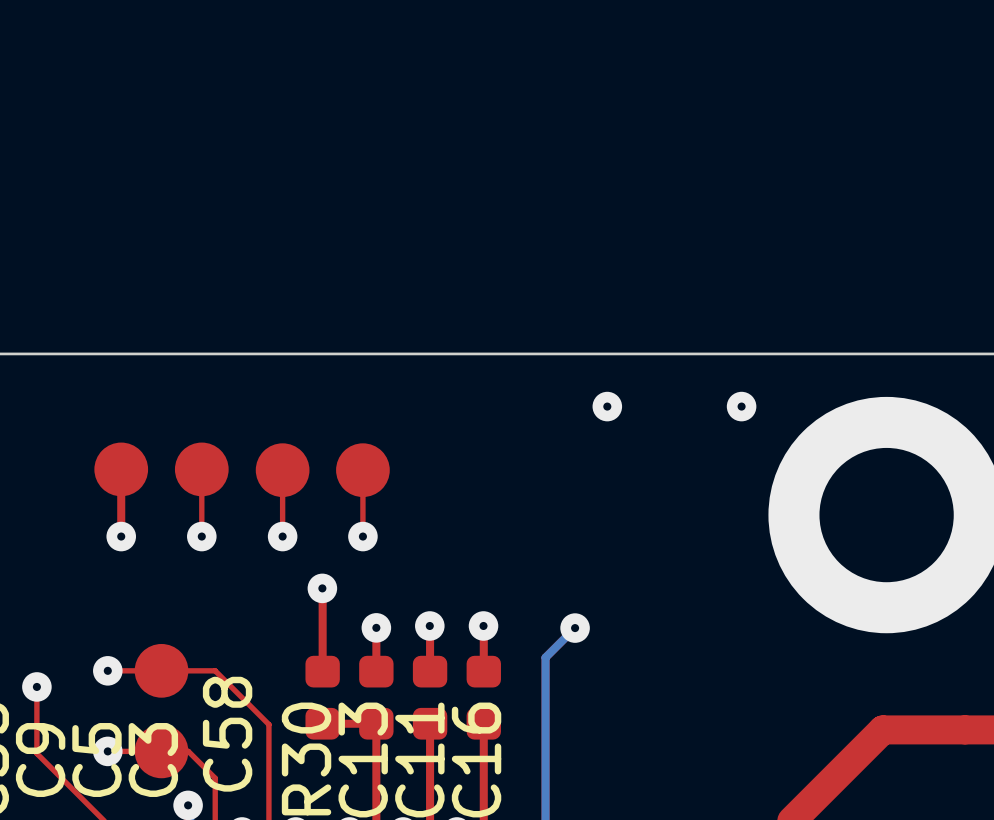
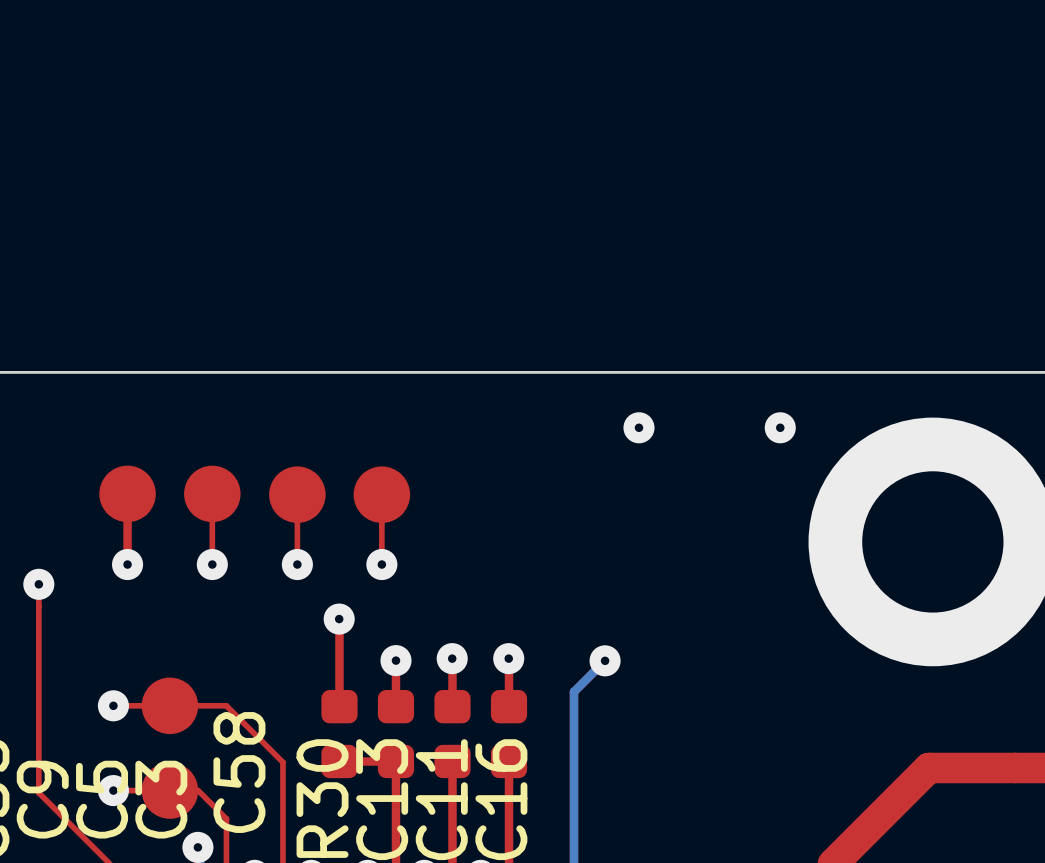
top track: none -> (38, 584) (38, 722)
via: none -> (38, 584)
via: (36, 686) -> none

